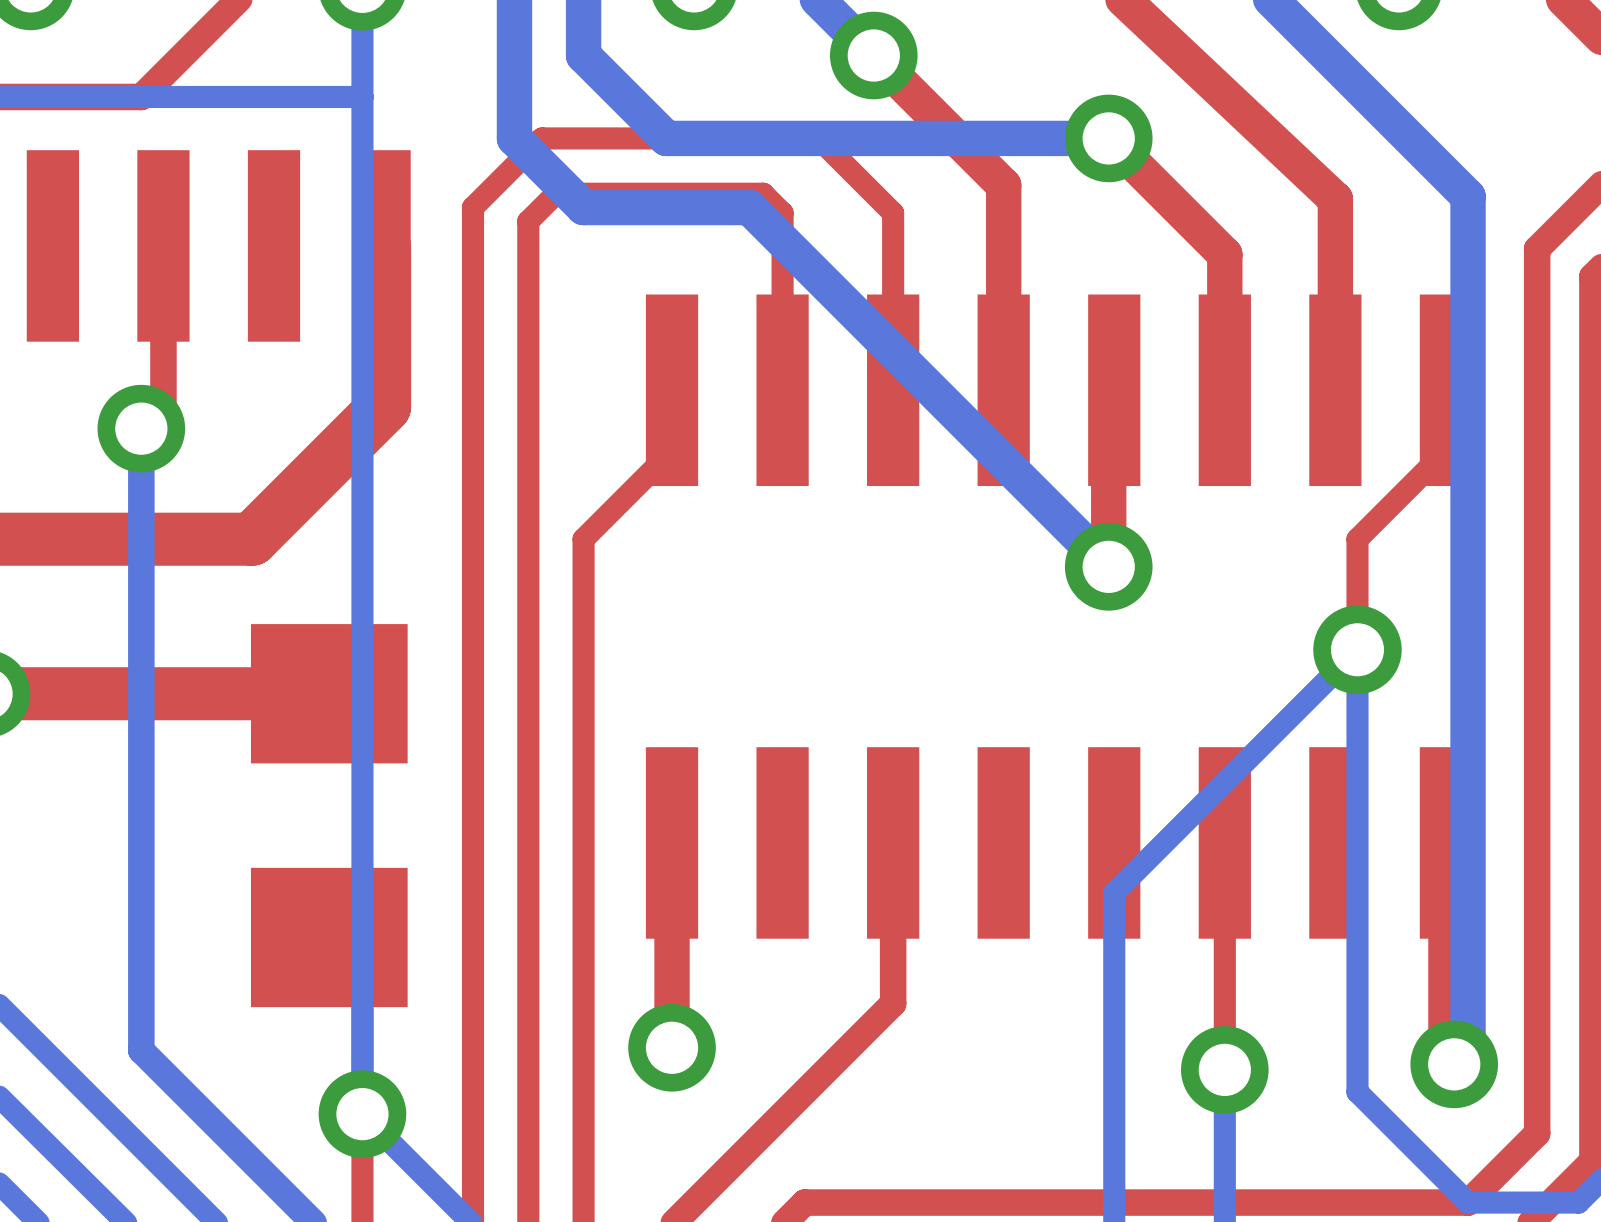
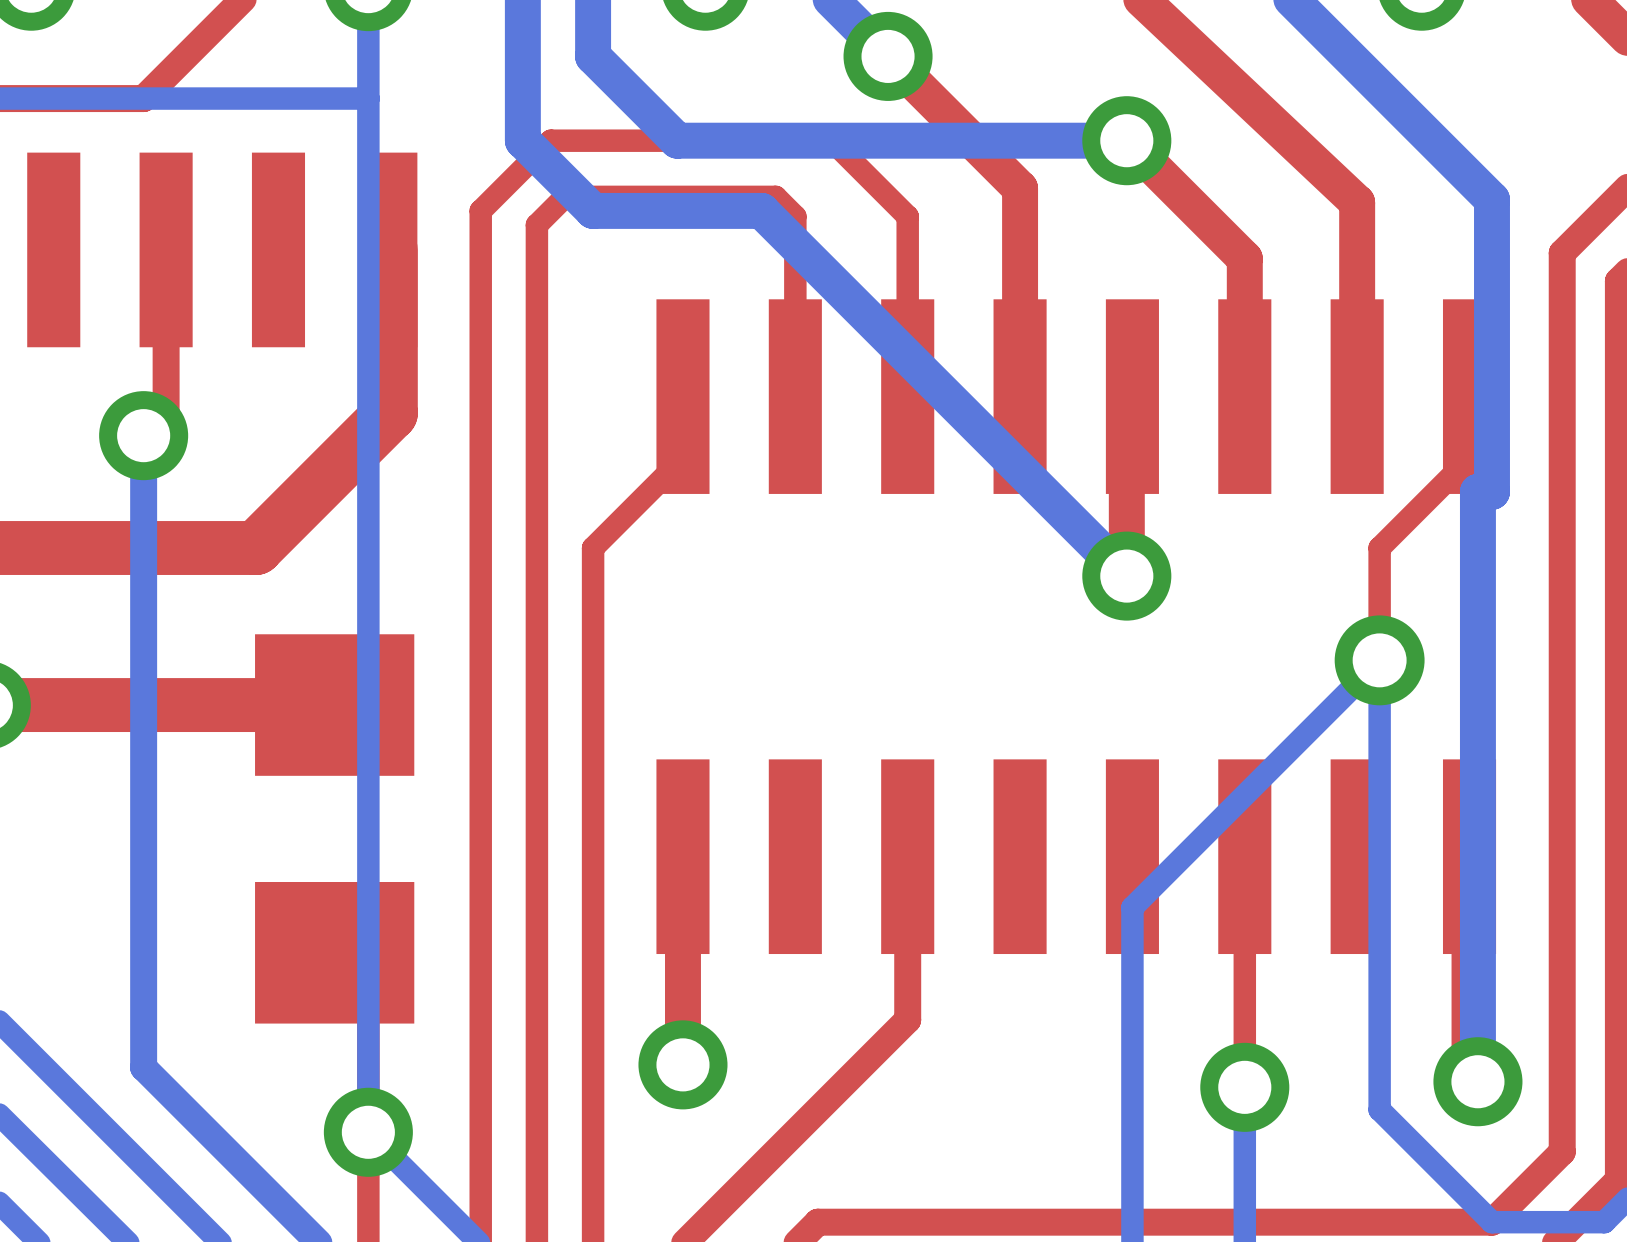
bottom track: (1468, 483) (1468, 1050) (1454, 1064) -> (1491, 491) (1477, 491) (1477, 1081)

